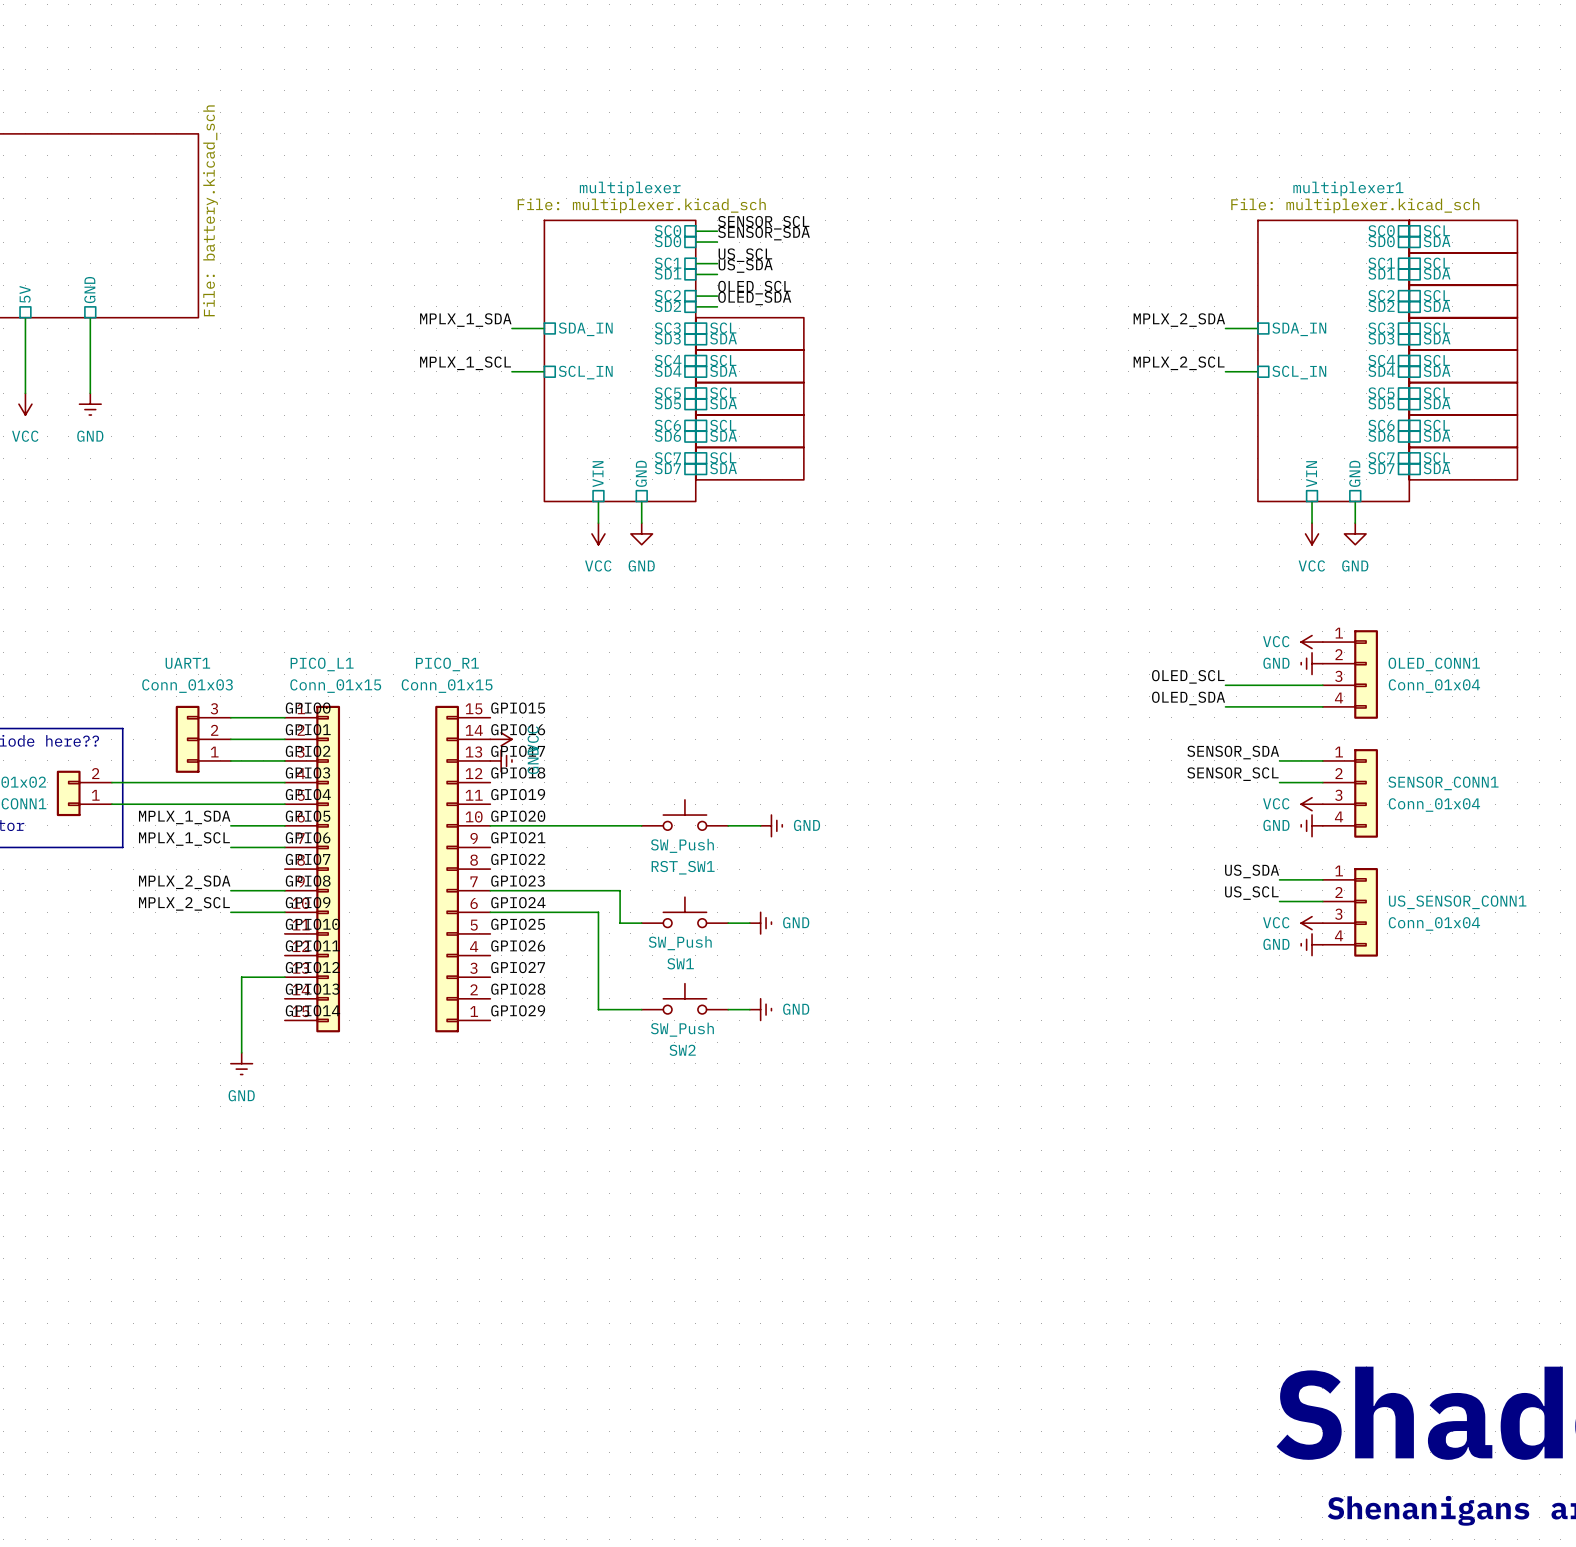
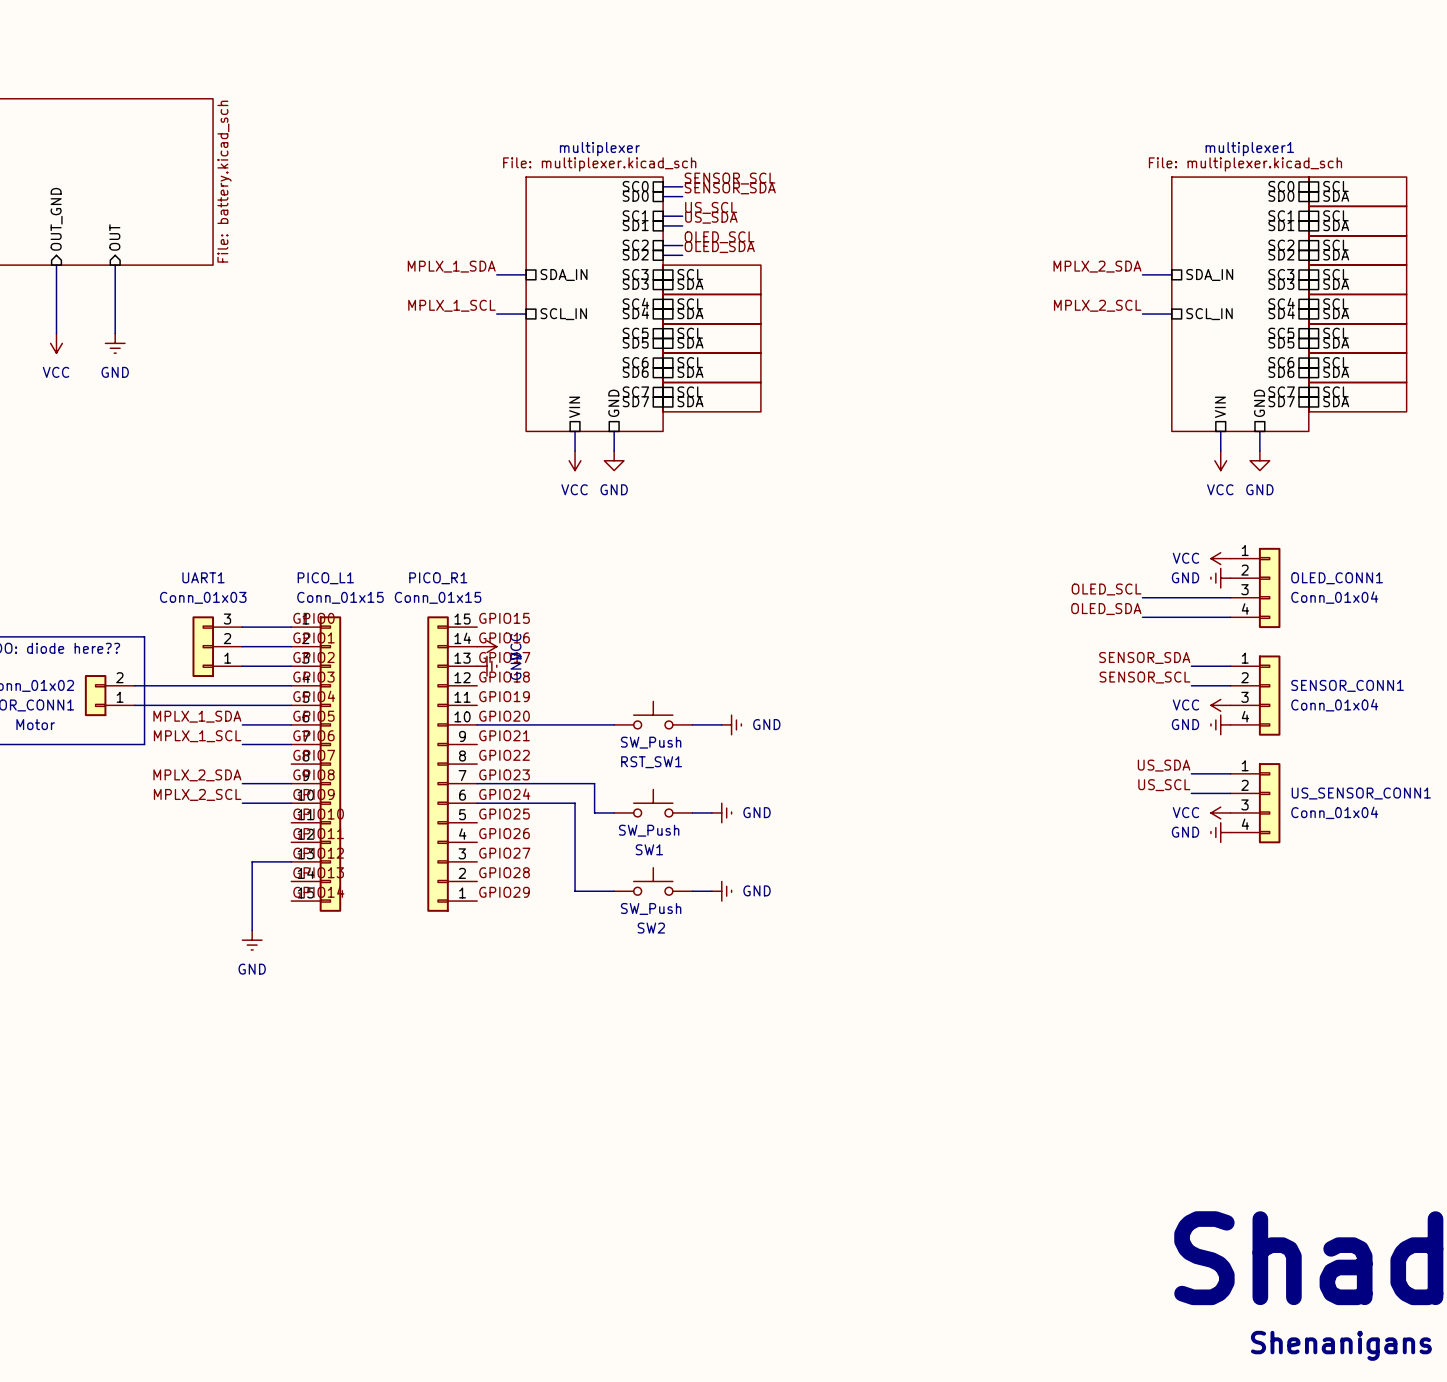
sheet pin shape: passive (89, 290) -> input (114, 237)
sheet pin: GND (89, 290) -> OUT (114, 237)
sheet pin shape: passive (25, 294) -> input (56, 219)
sheet pin: 5V (25, 294) -> OUT_GND (56, 219)

